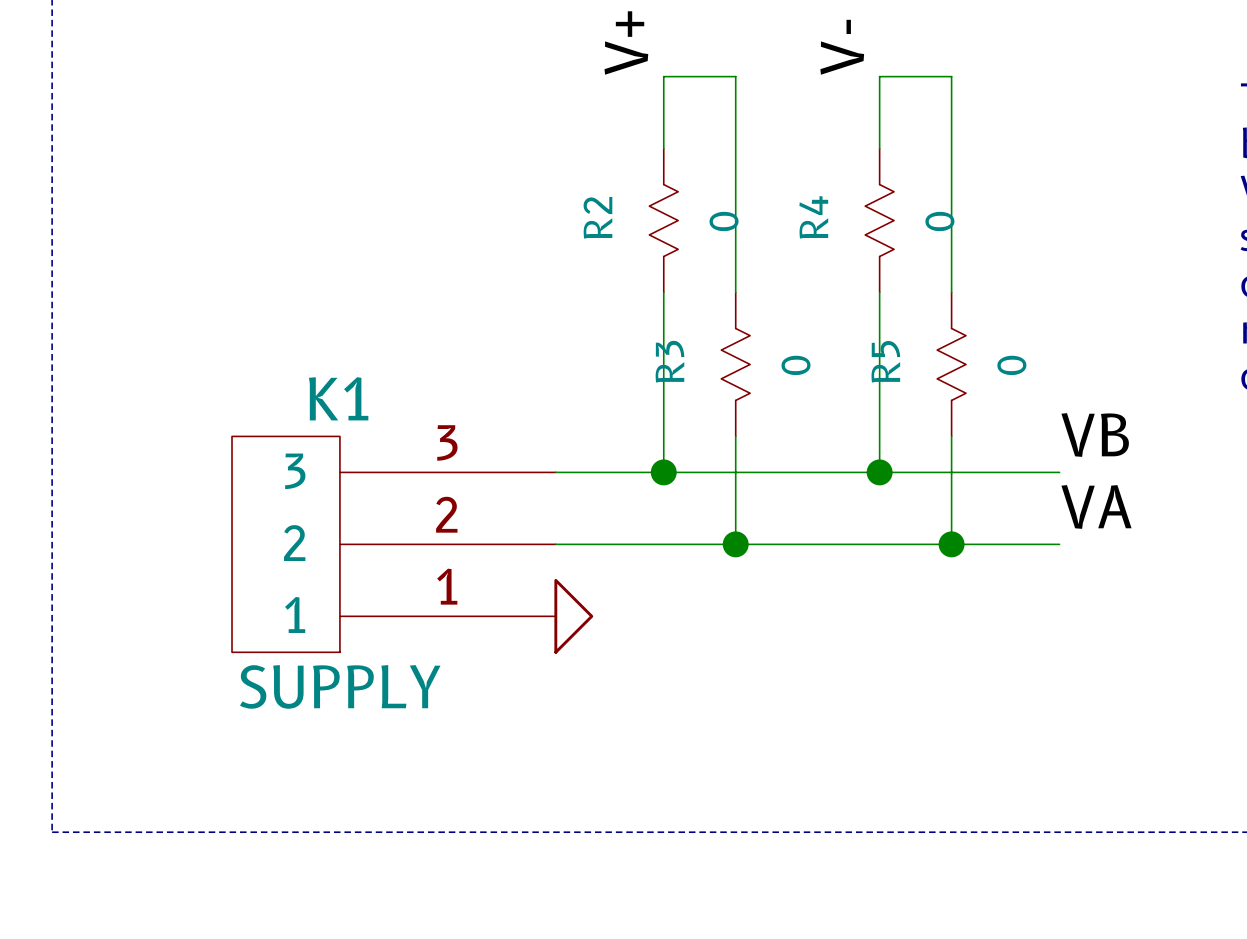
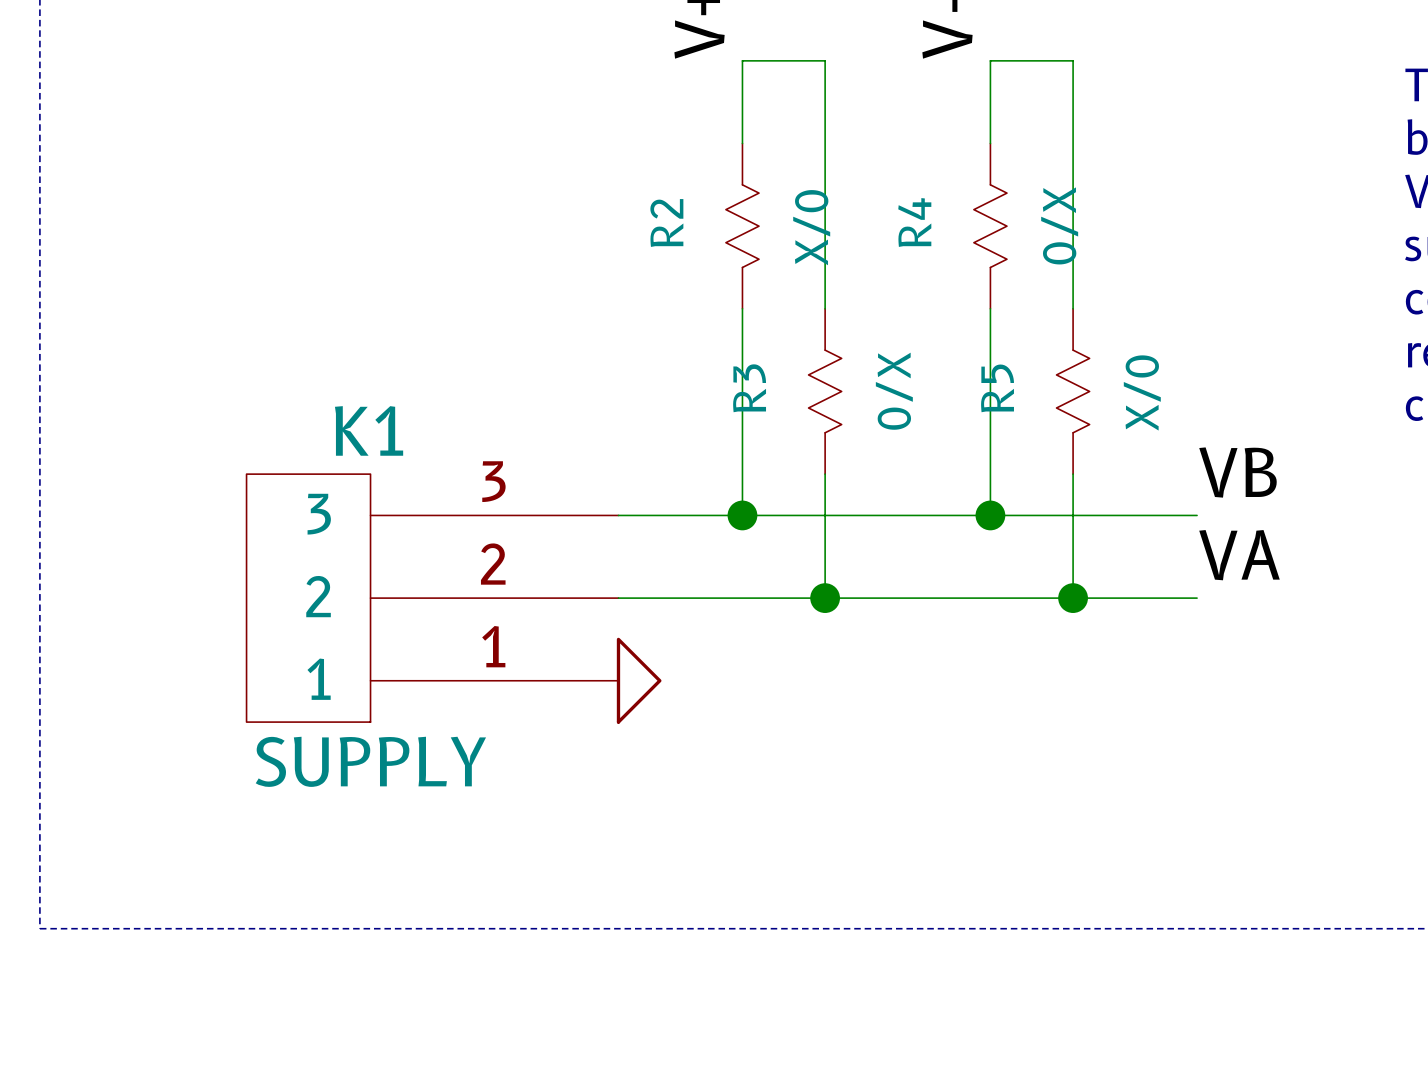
R2 value: 0 (724, 221) -> X/0 (811, 227)
R4 value: 0 (939, 221) -> 0/X (1059, 225)
R3 value: 0 (796, 365) -> 0/X (894, 391)
R5 value: 0 (1011, 365) -> X/0 (1142, 392)

